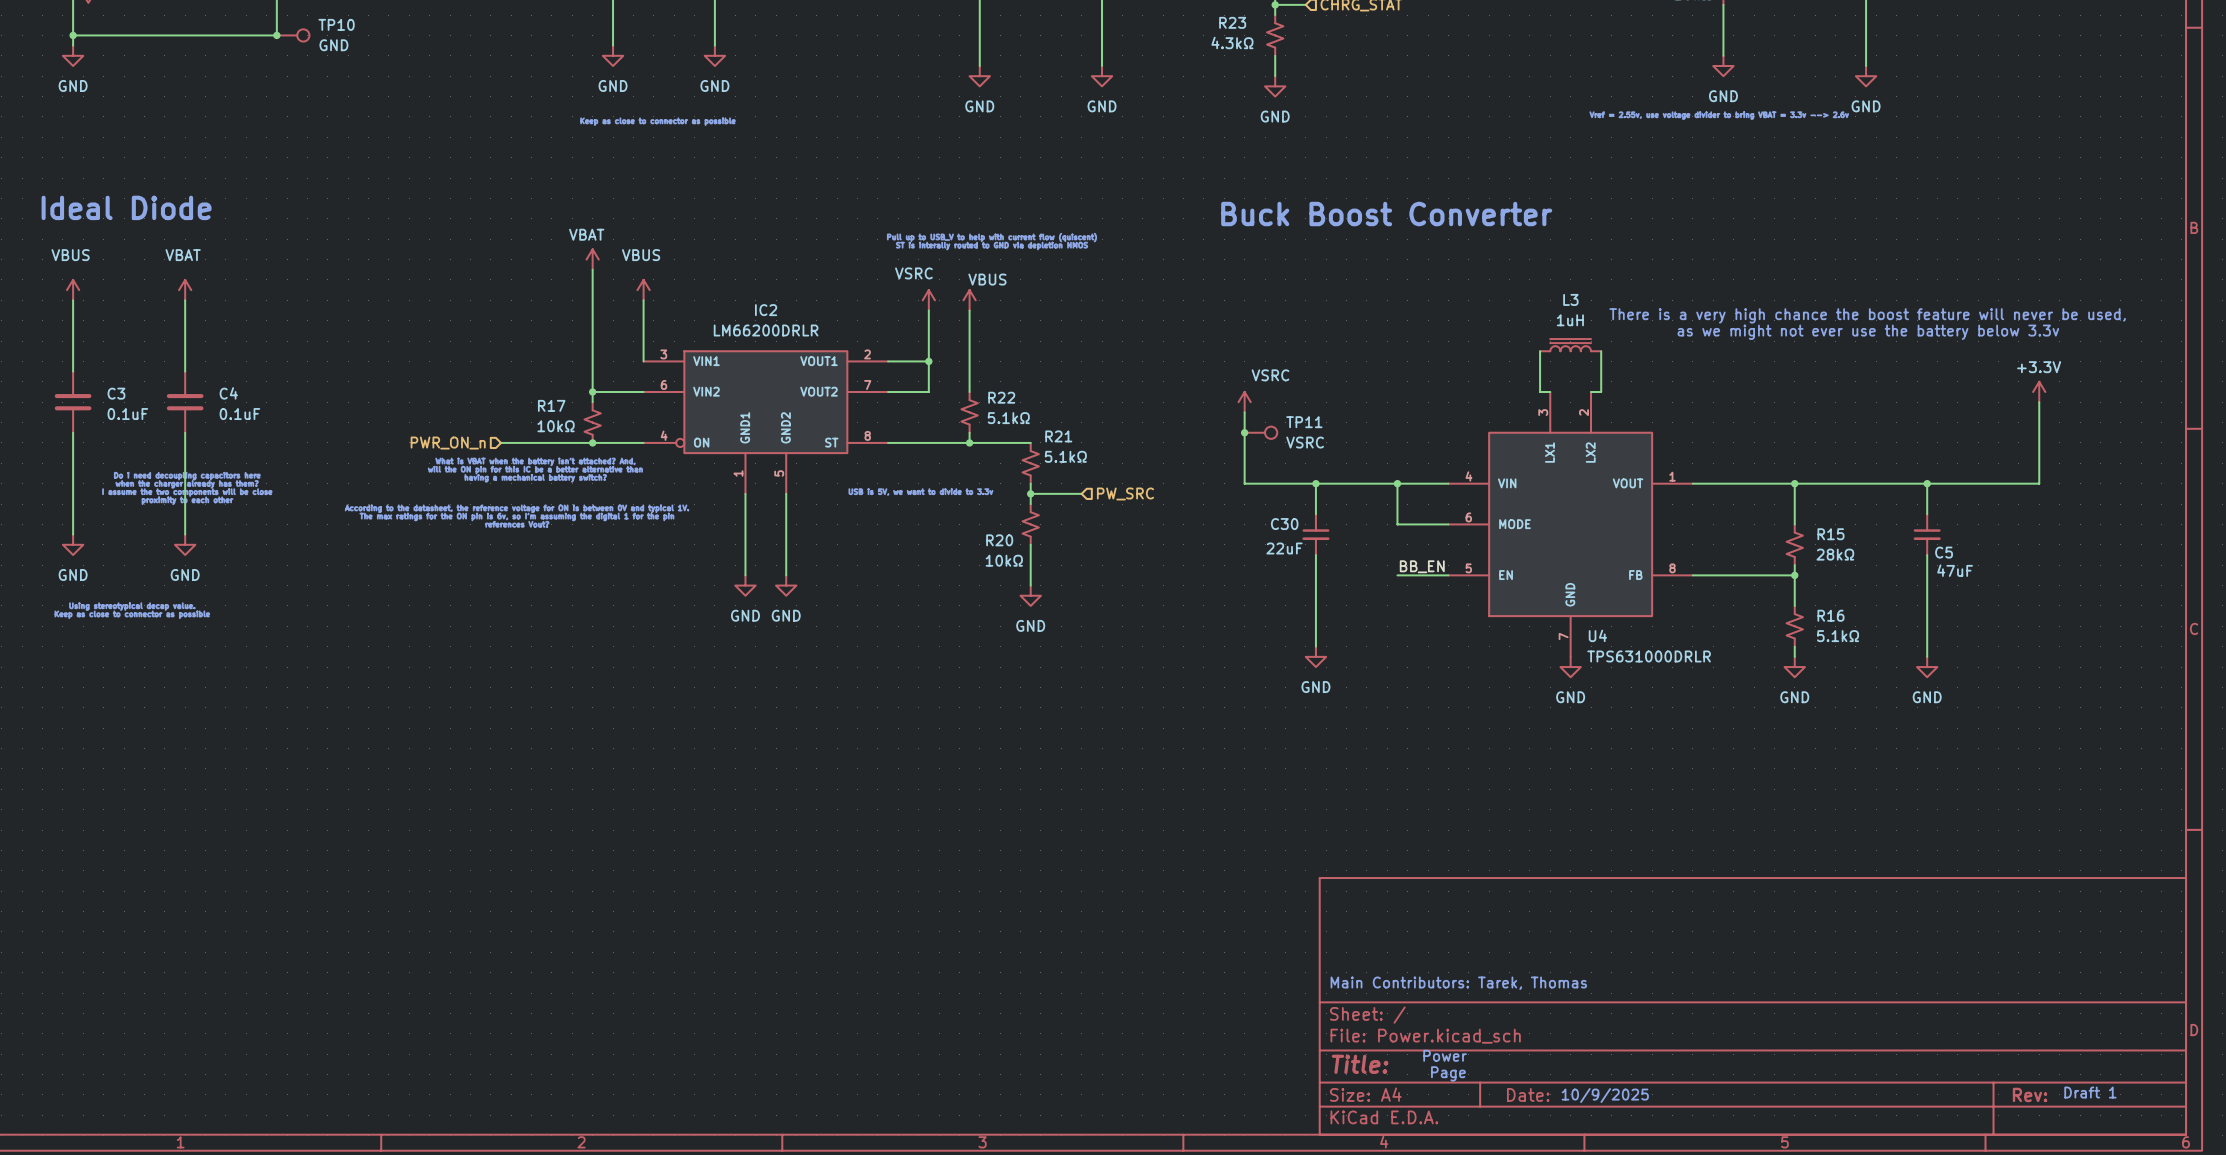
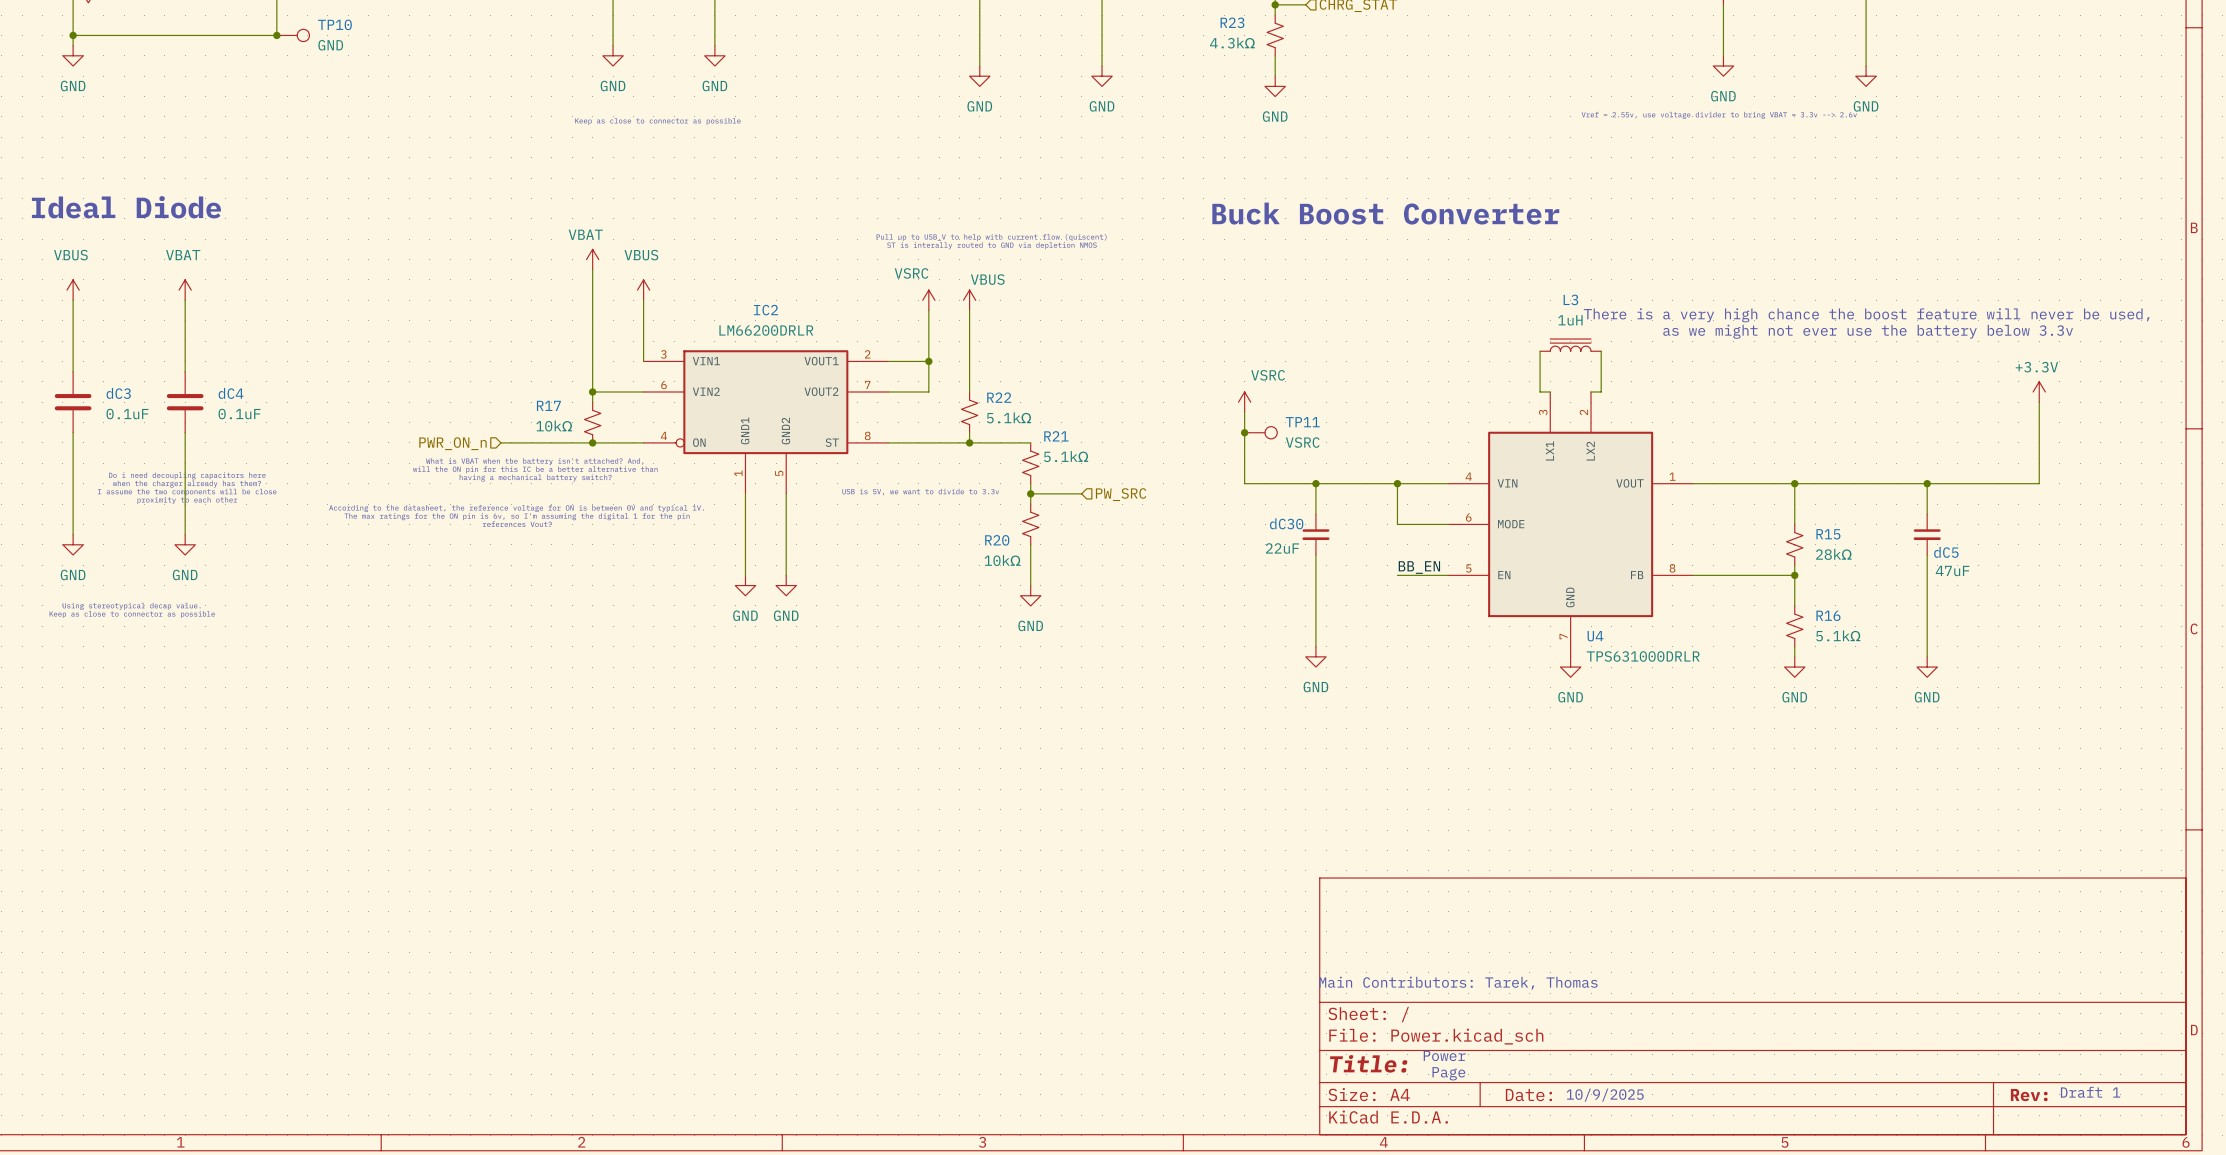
C3 name: C3 (116, 393) -> dC3 (118, 393)
C4 name: C4 (228, 393) -> dC4 (231, 393)
C30 name: C30 (1284, 524) -> dC30 (1286, 523)
C5 name: C5 (1944, 552) -> dC5 (1946, 552)

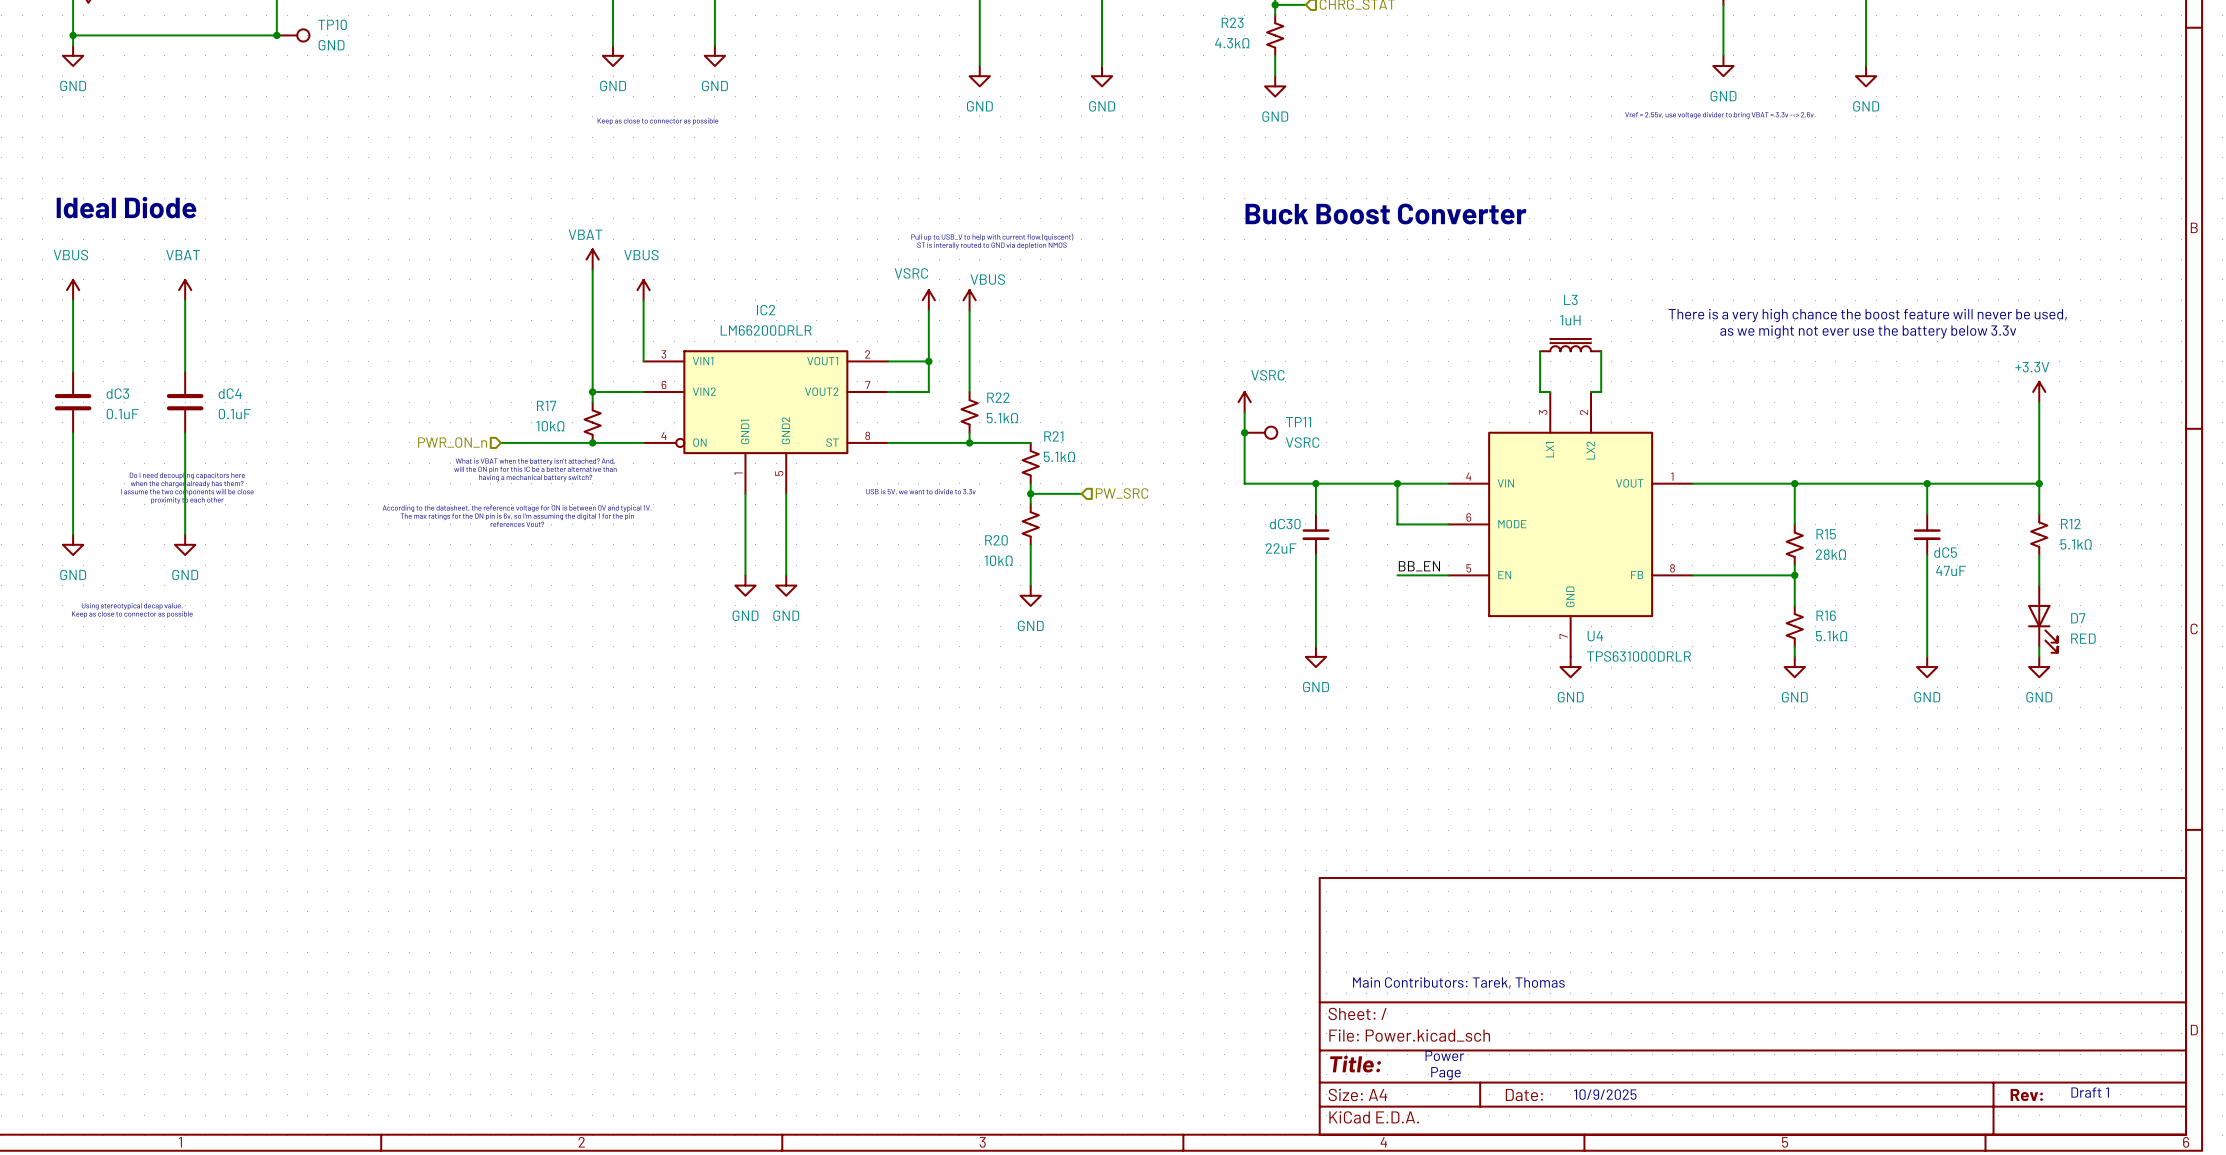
wire: none -> (2039, 483) (2039, 514)
junction: none -> (2039, 483)
R12: none -> 5.1kΩ (2039, 534)
wire: none -> (2039, 554) (2039, 585)
D7: none -> RED (2042, 619)
wire: none -> (2039, 646) (2039, 656)
power symbol: none -> GND (2039, 667)

